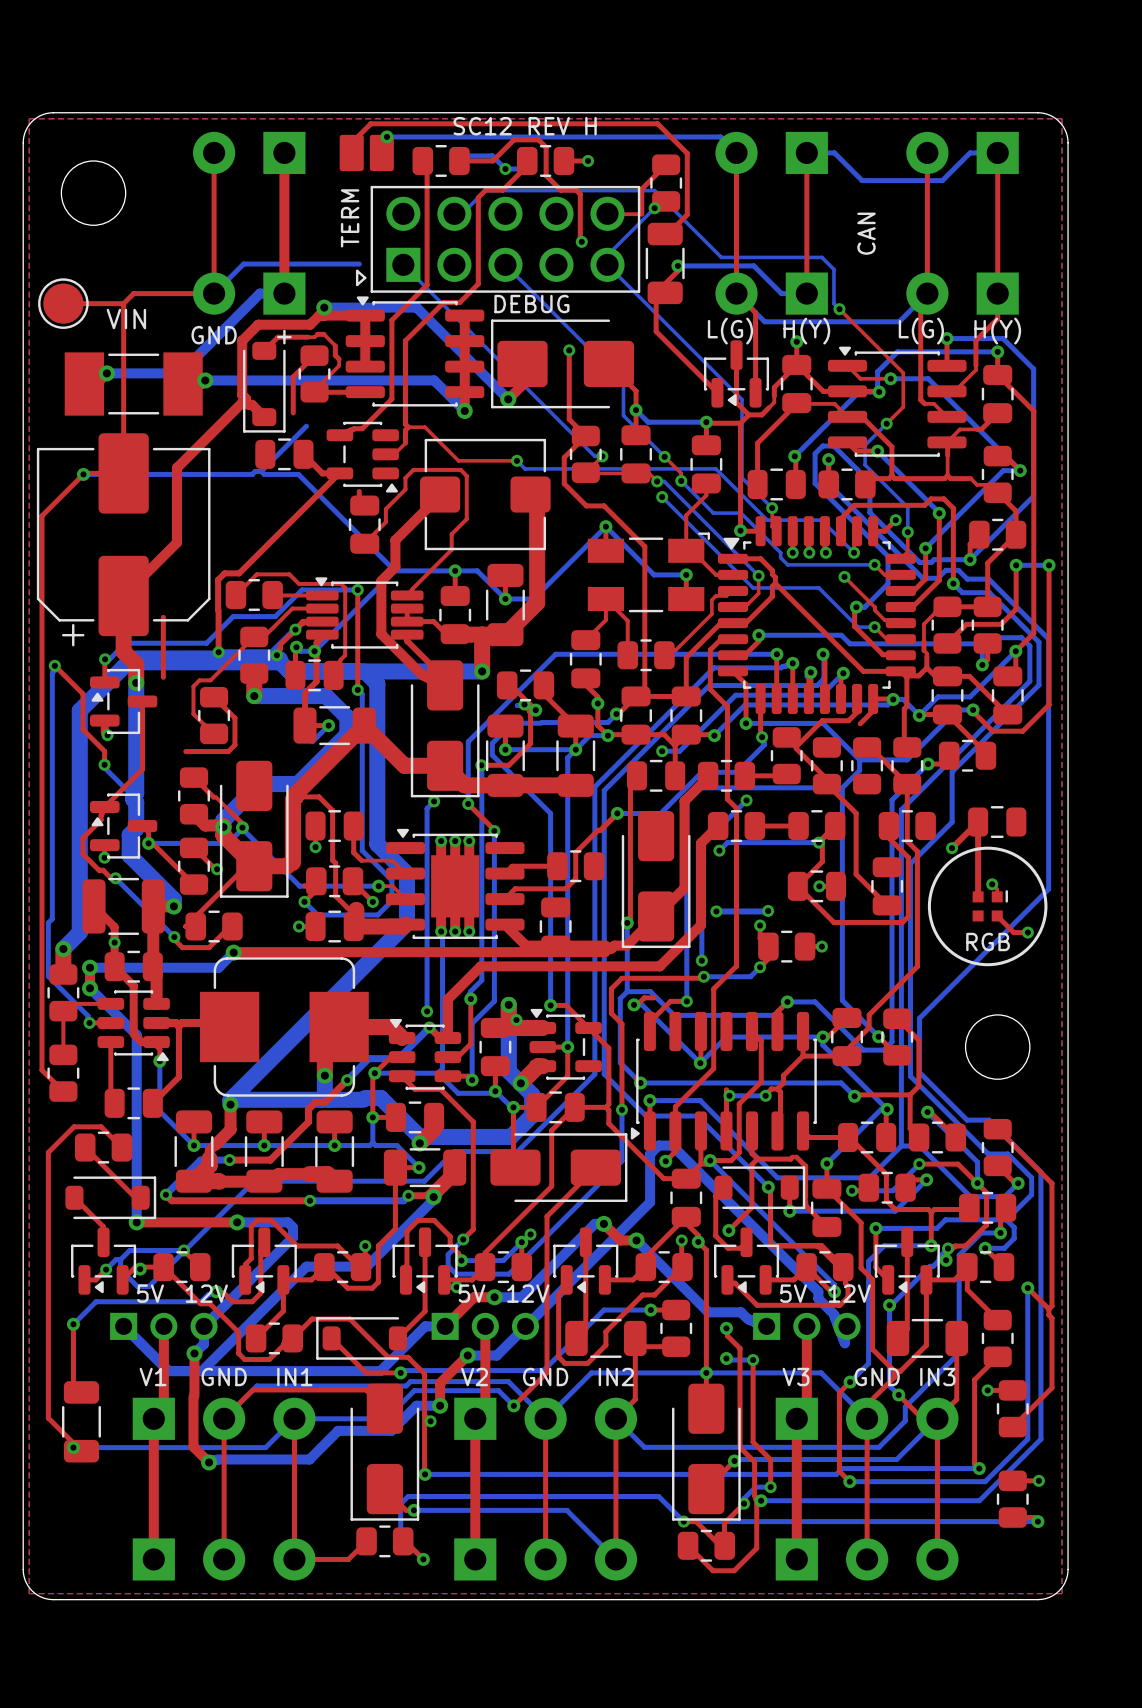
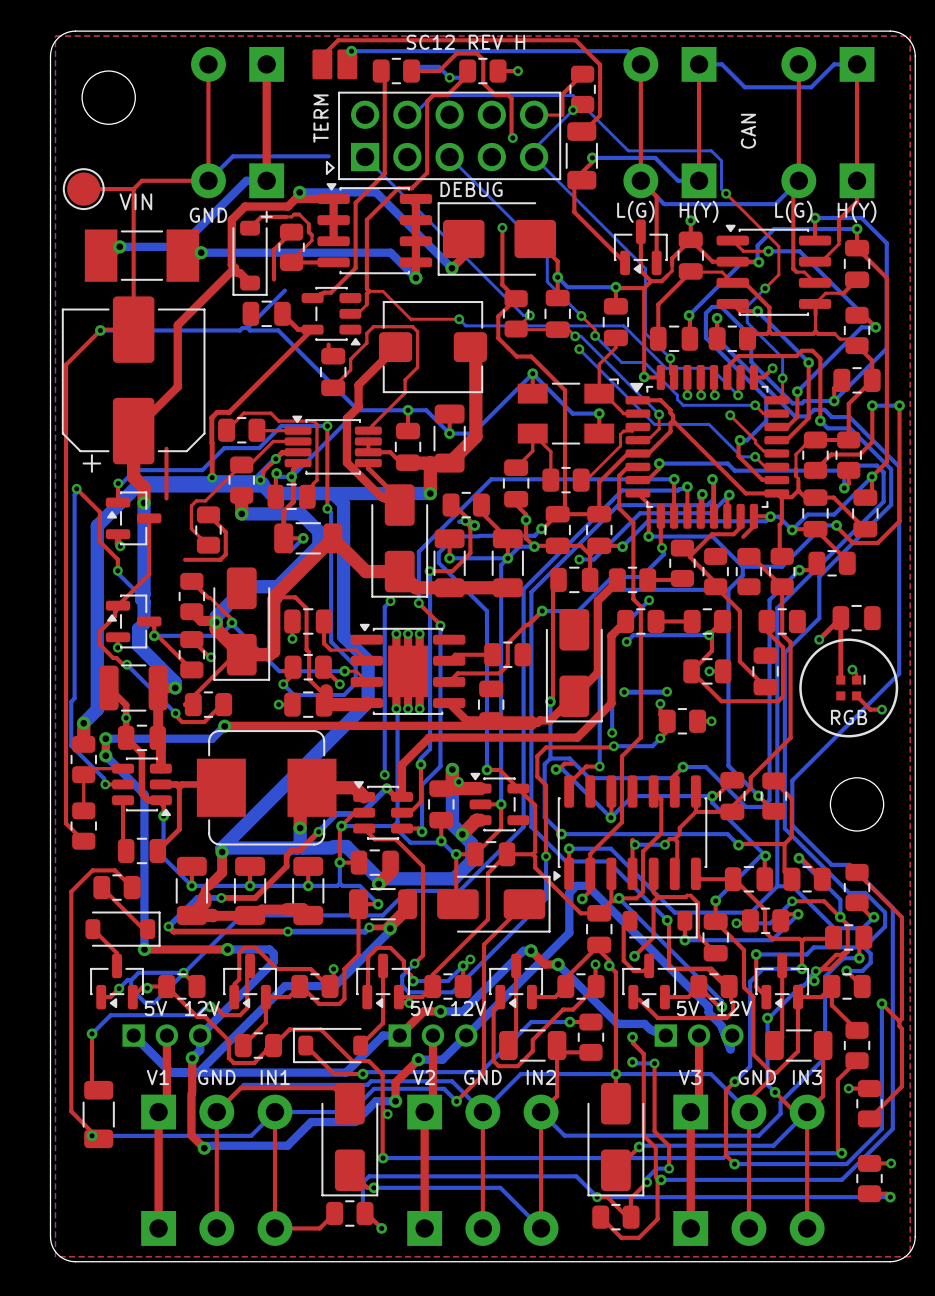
top track: none -> (847, 948) (841, 954) (836, 954) (821, 969)

